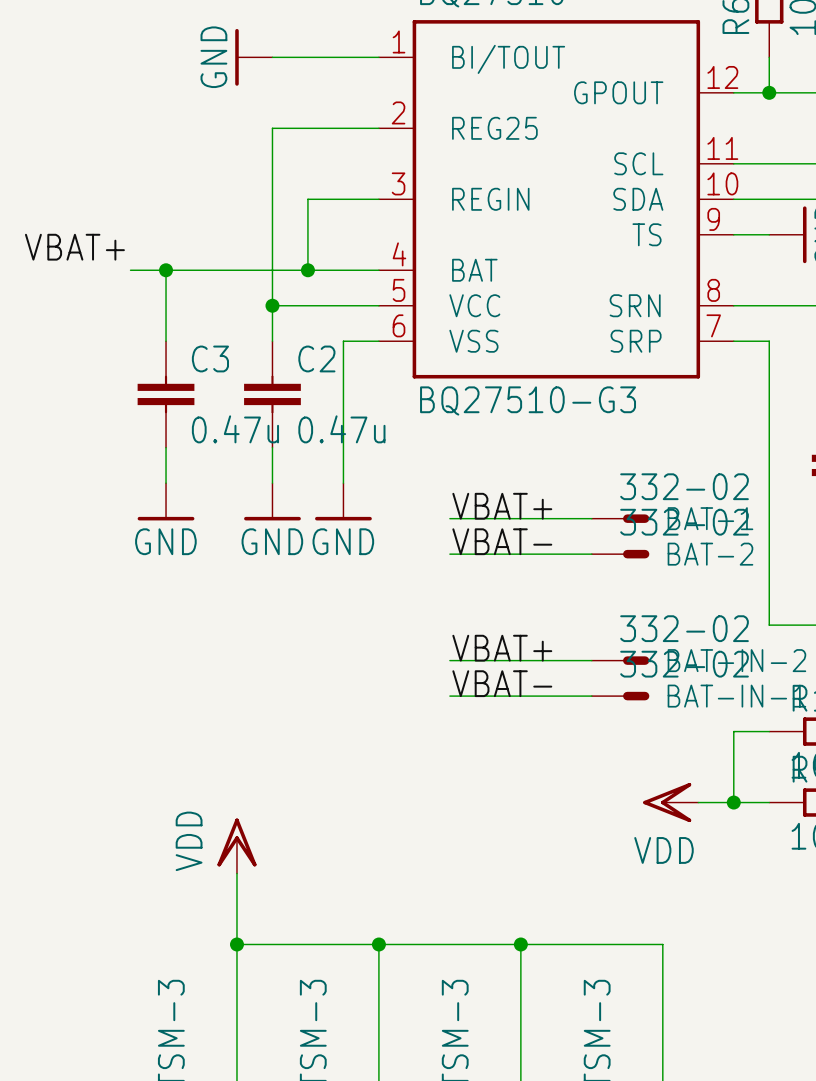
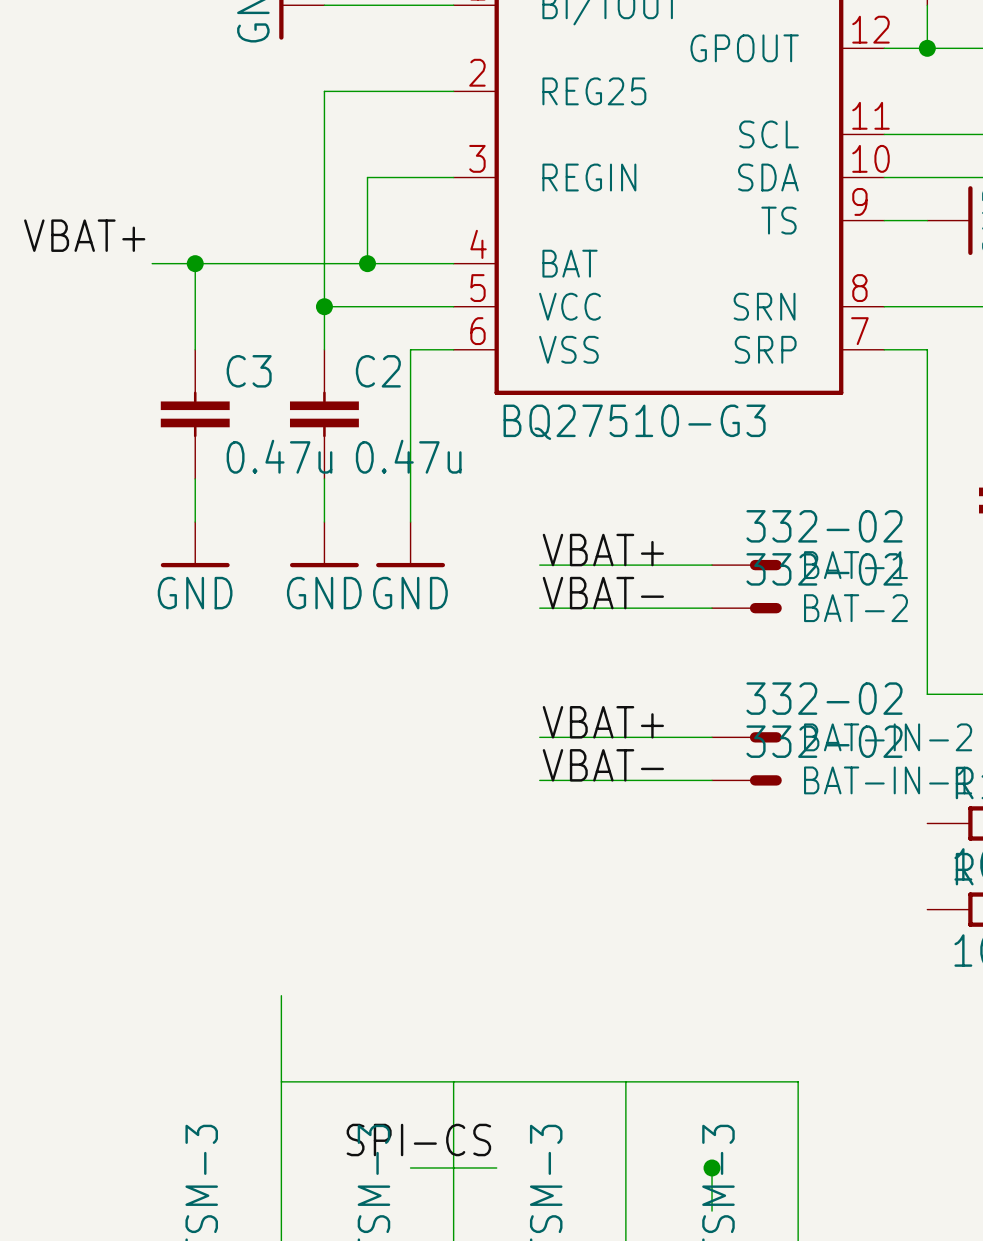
wire: (769, 731) (733, 731) (733, 802) -> none
power symbol: VDD (670, 802) -> none
wire: (698, 802) (769, 802) -> none
junction: (733, 802) -> none
power symbol: VDD (236, 846) -> none
junction: (236, 944) -> none
junction: (378, 944) -> none
junction: (520, 944) -> none
label: none -> SPI-CS (418, 1140)
wire: none -> (410, 1167) (496, 1167)
wire: none -> (712, 1167) (712, 1211)
junction: none -> (712, 1167)

